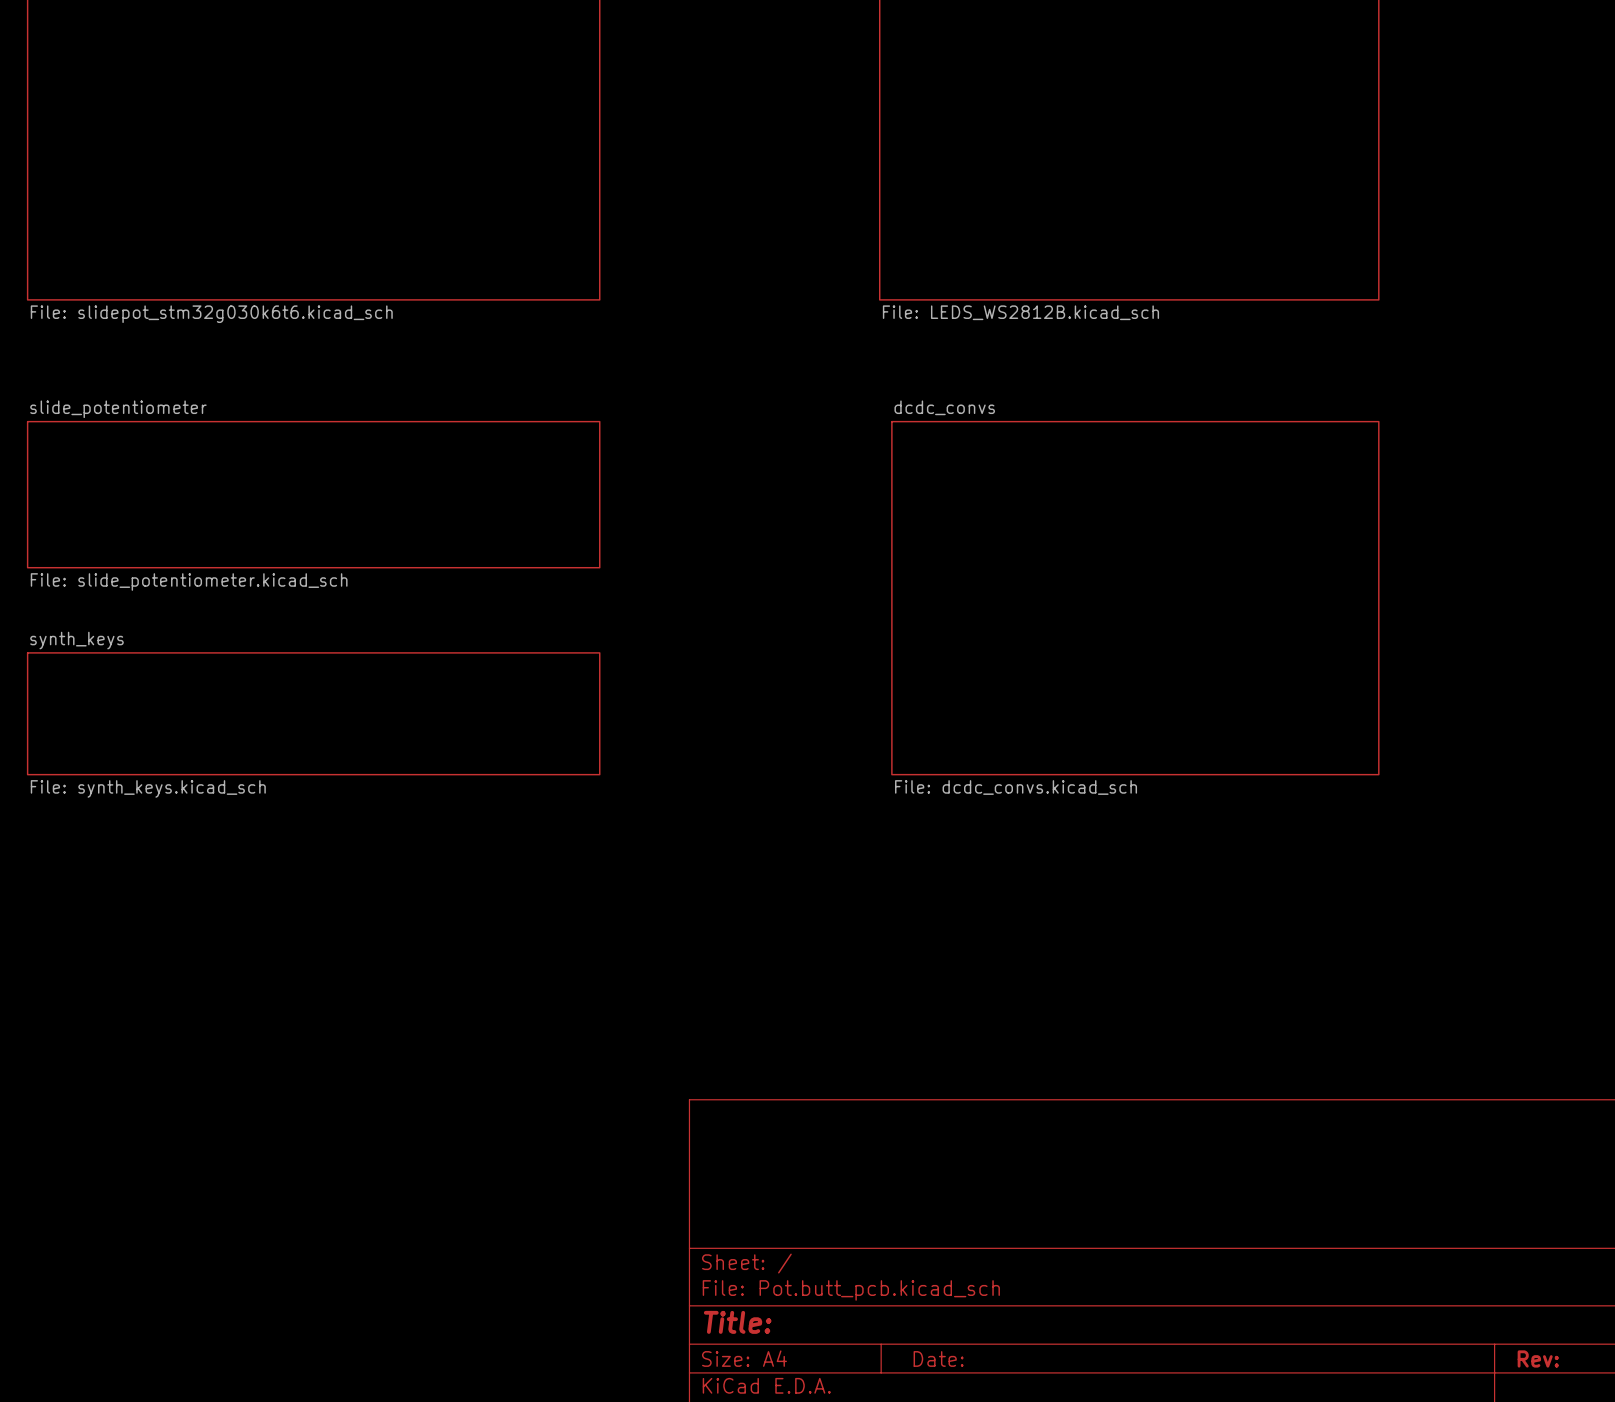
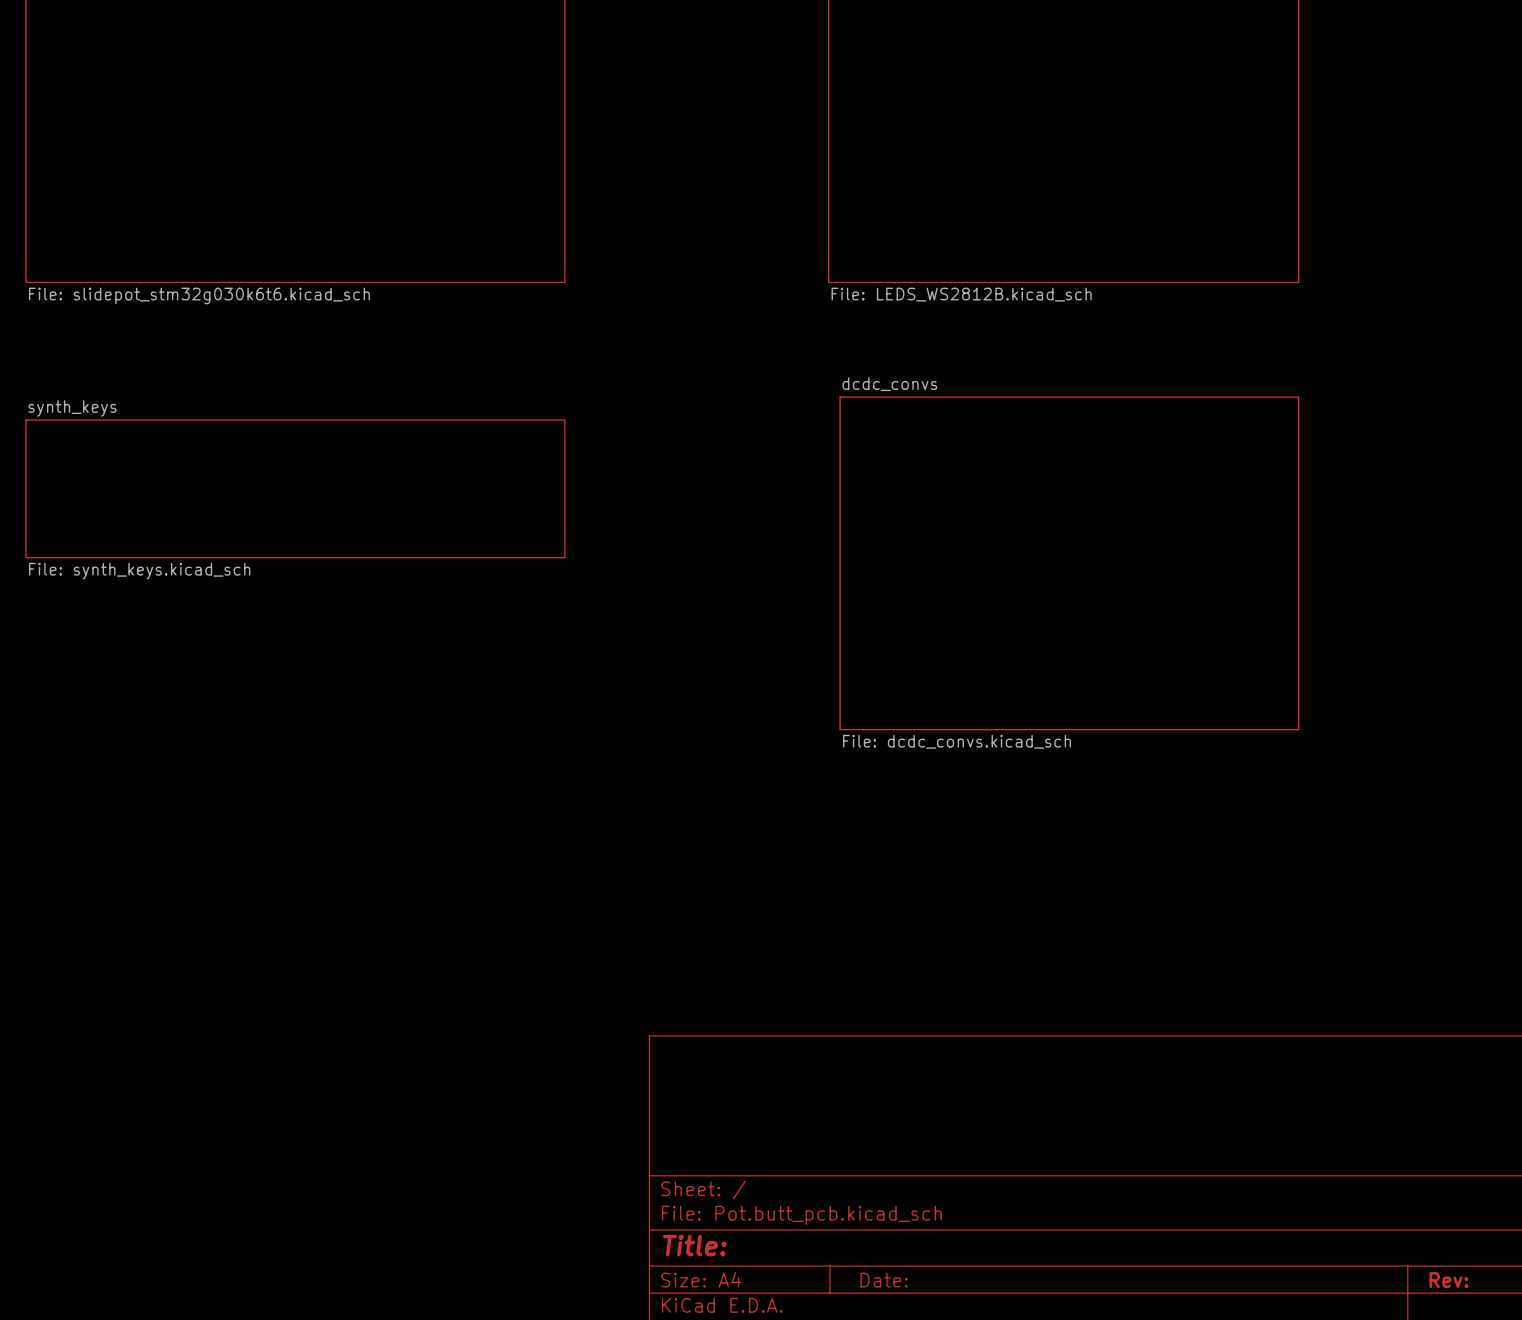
sheet slide_potentiometer: File: slide_potentiometer.kicad_sch (313, 494) -> none
sheet synth_keys: none -> File: synth_keys.kicad_sch (295, 488)
sheet synth_keys: File: synth_keys.kicad_sch (313, 713) -> none

